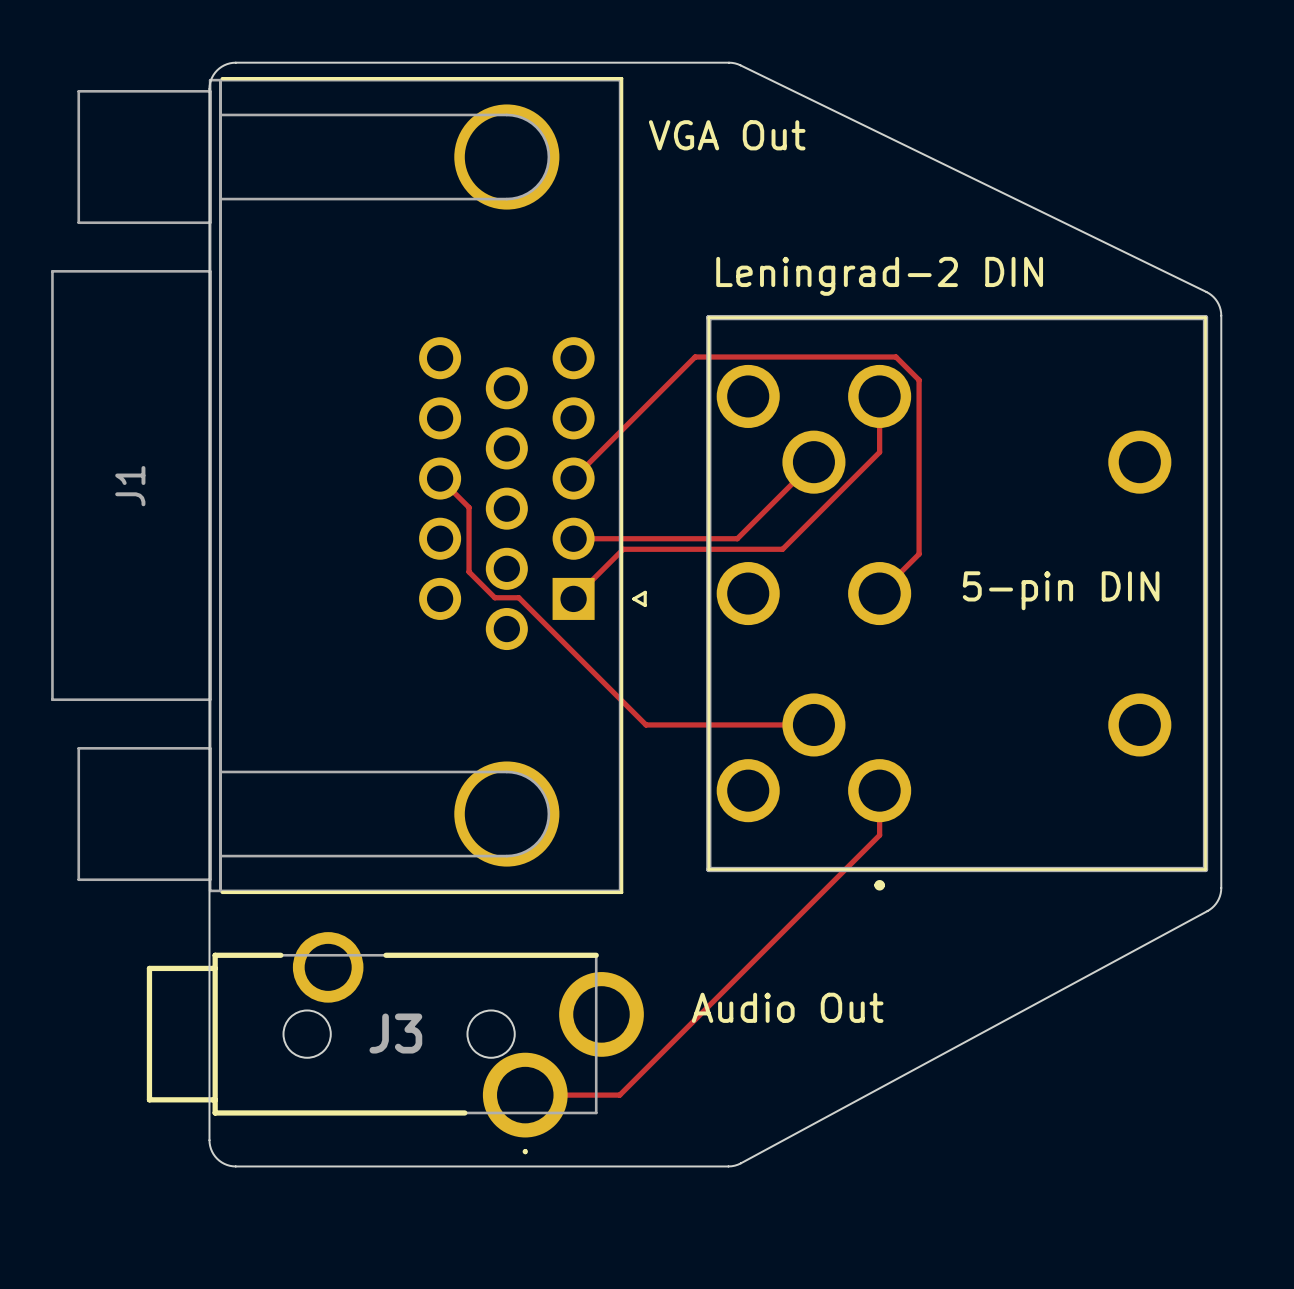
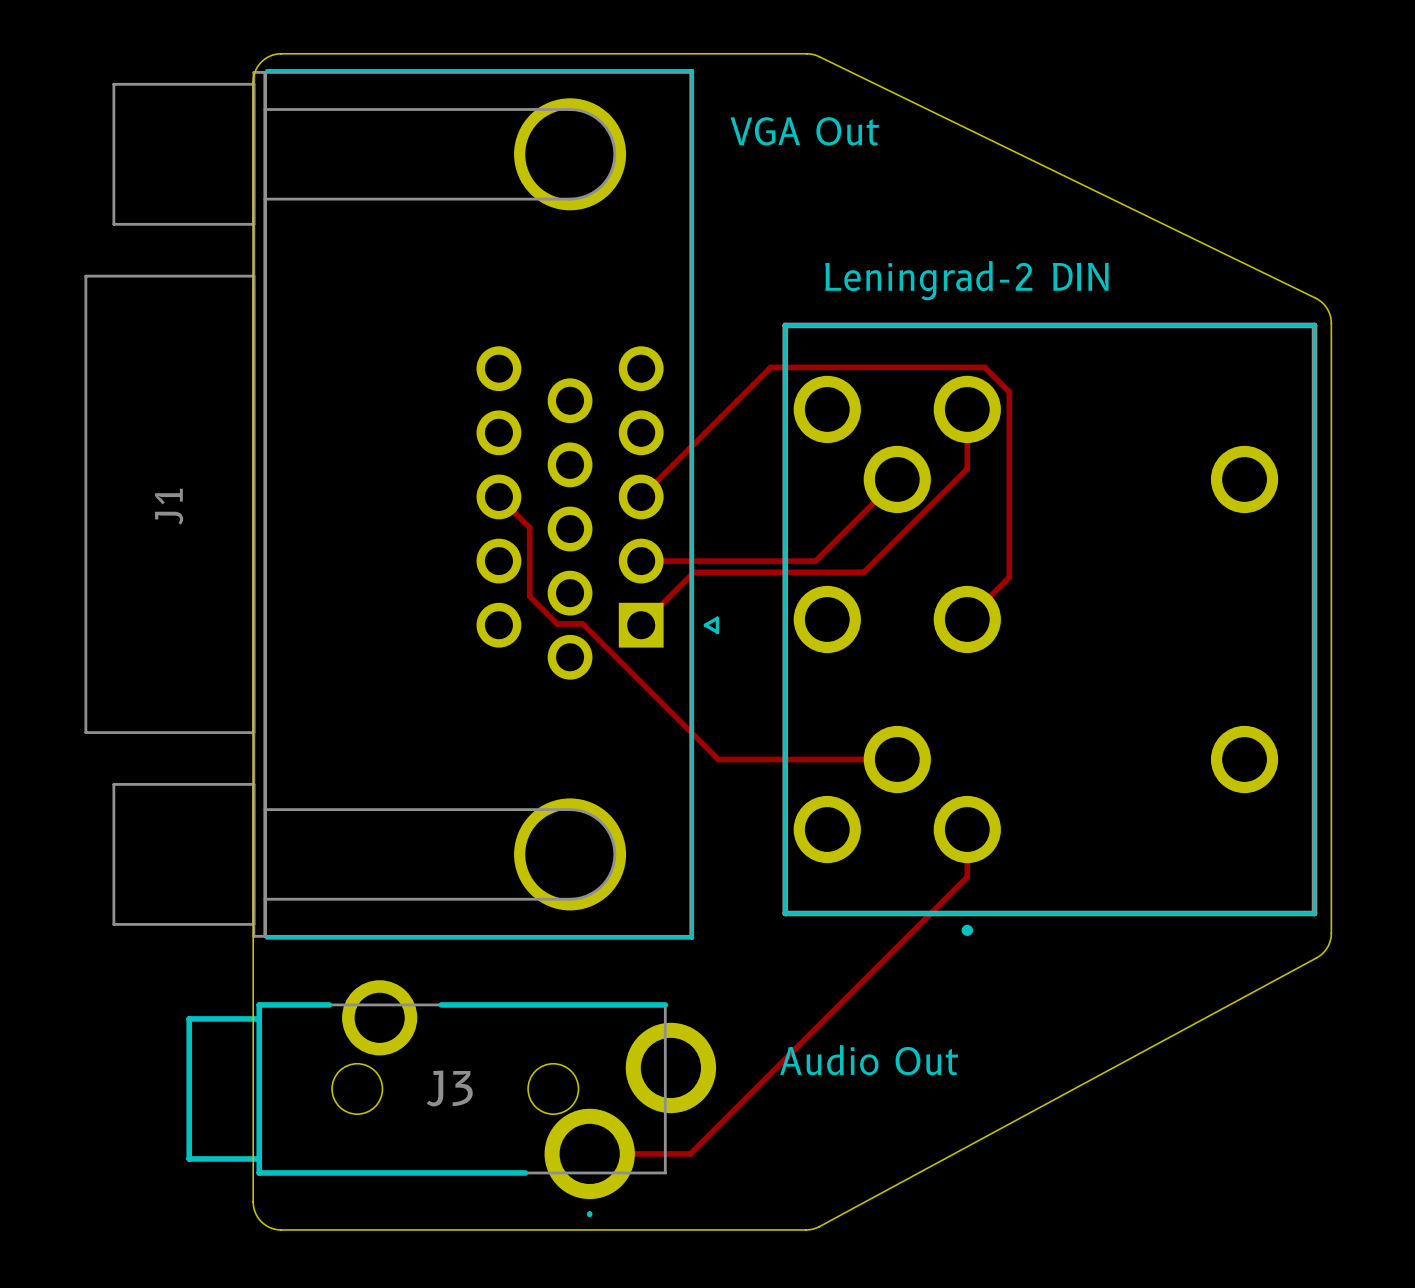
text: 5-pin DIN (1061, 590) -> none

